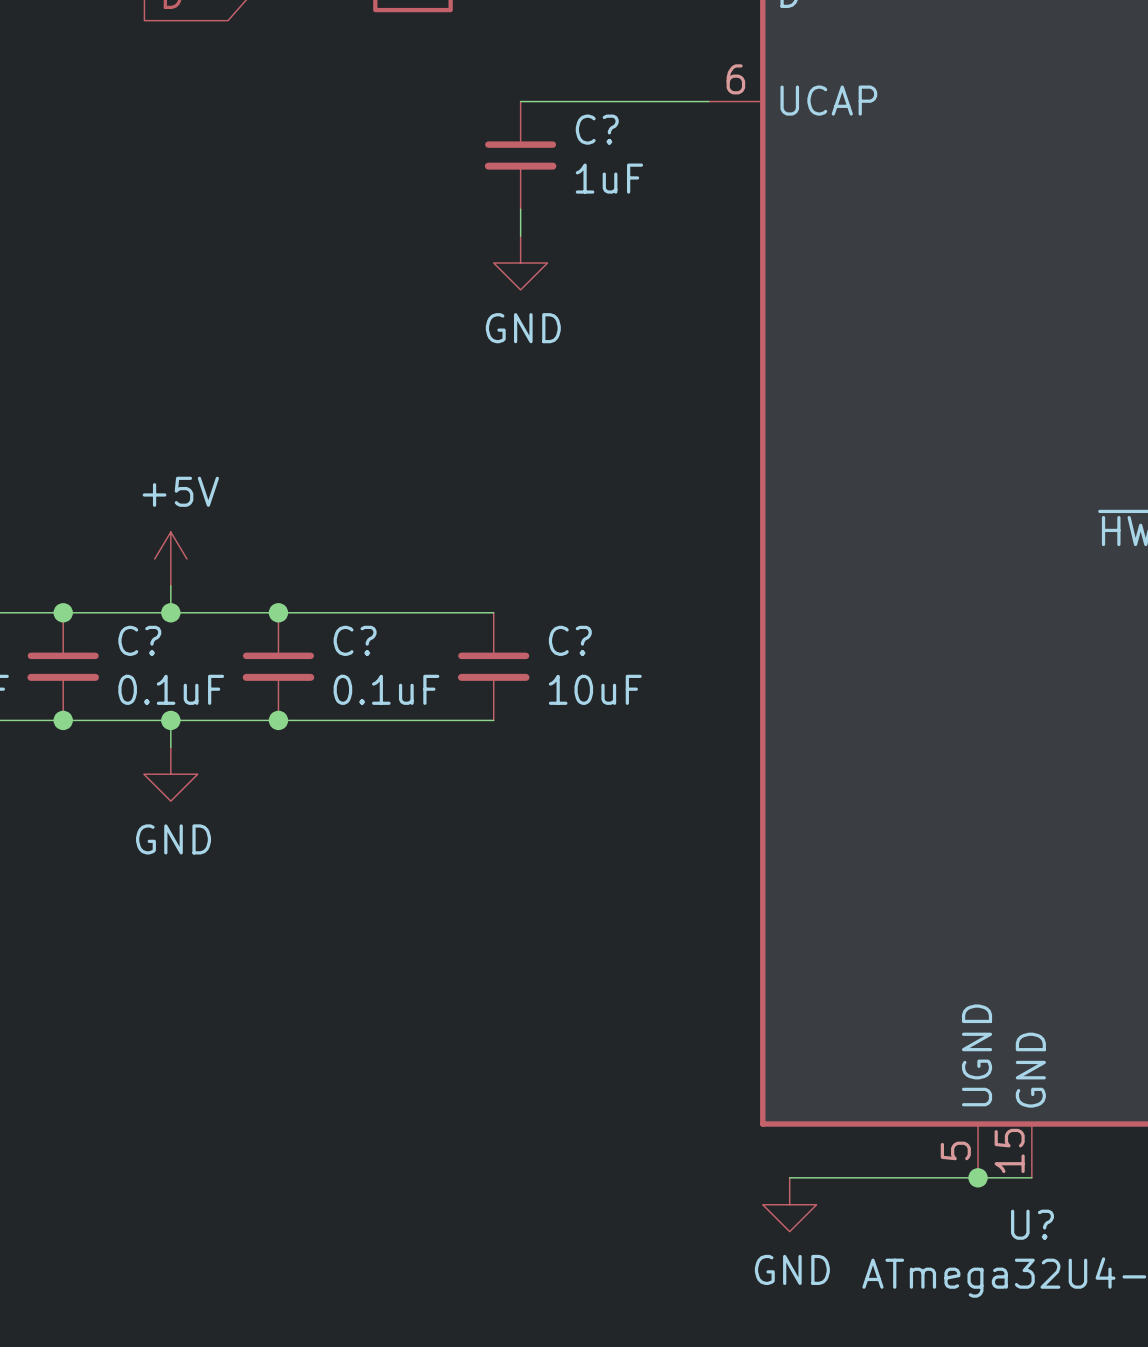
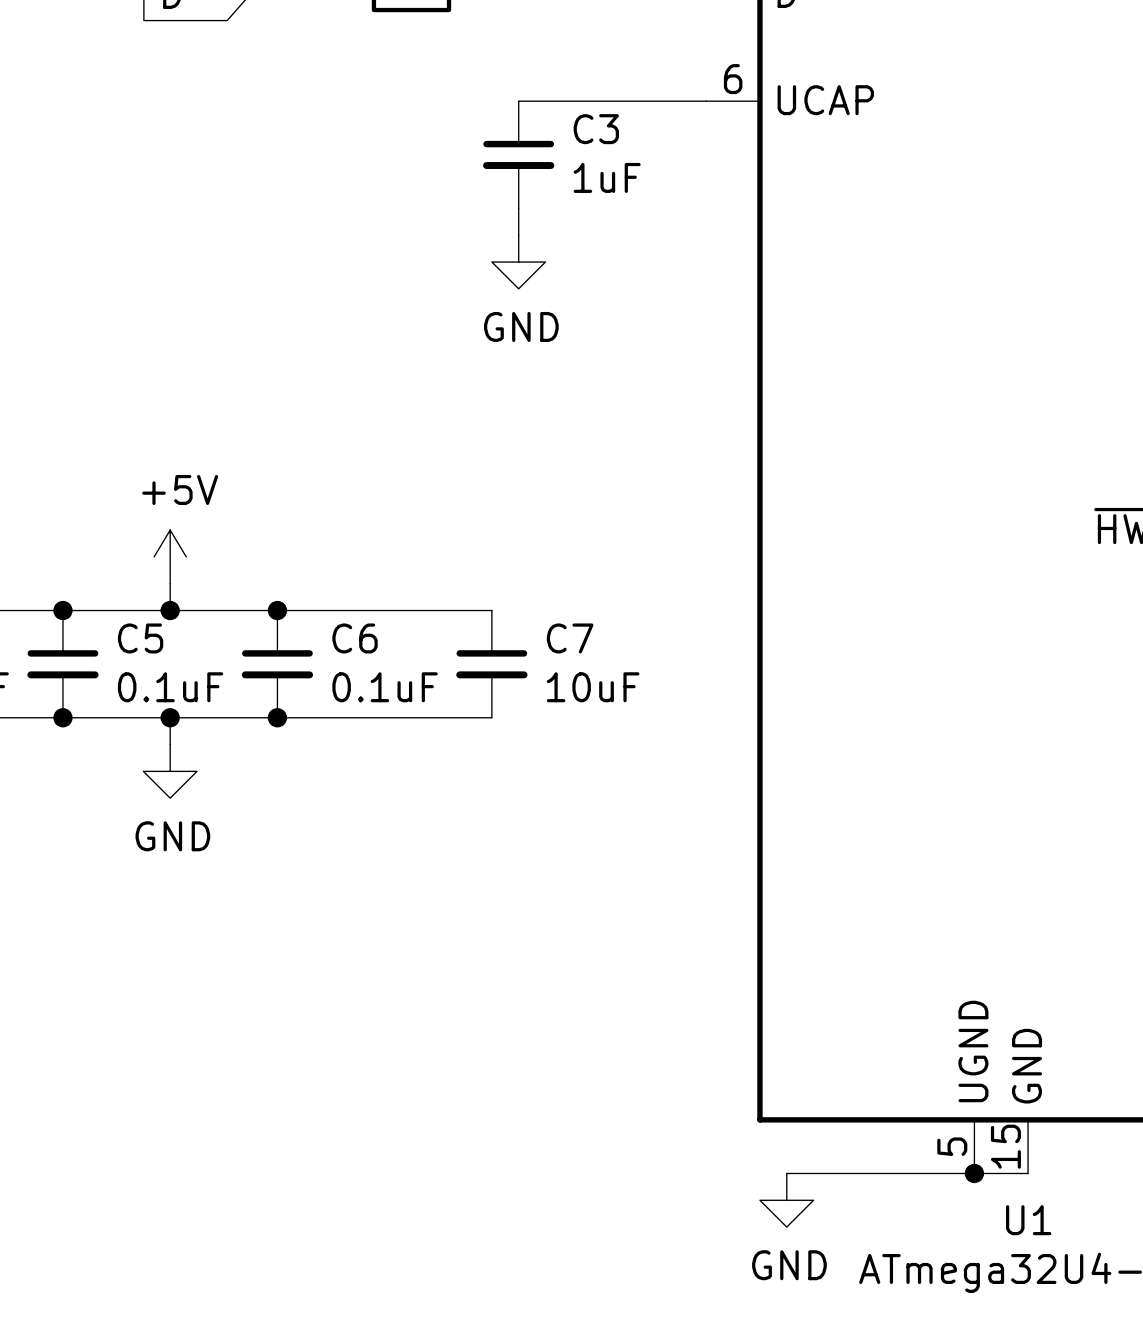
C? name: C? (597, 129) -> C3 (596, 129)
C? name: C? (139, 640) -> C5 (140, 638)
C? name: C? (355, 640) -> C6 (355, 638)
C? name: C? (570, 640) -> C7 (570, 638)
U? name: U? (1032, 1224) -> U1 (1028, 1220)

